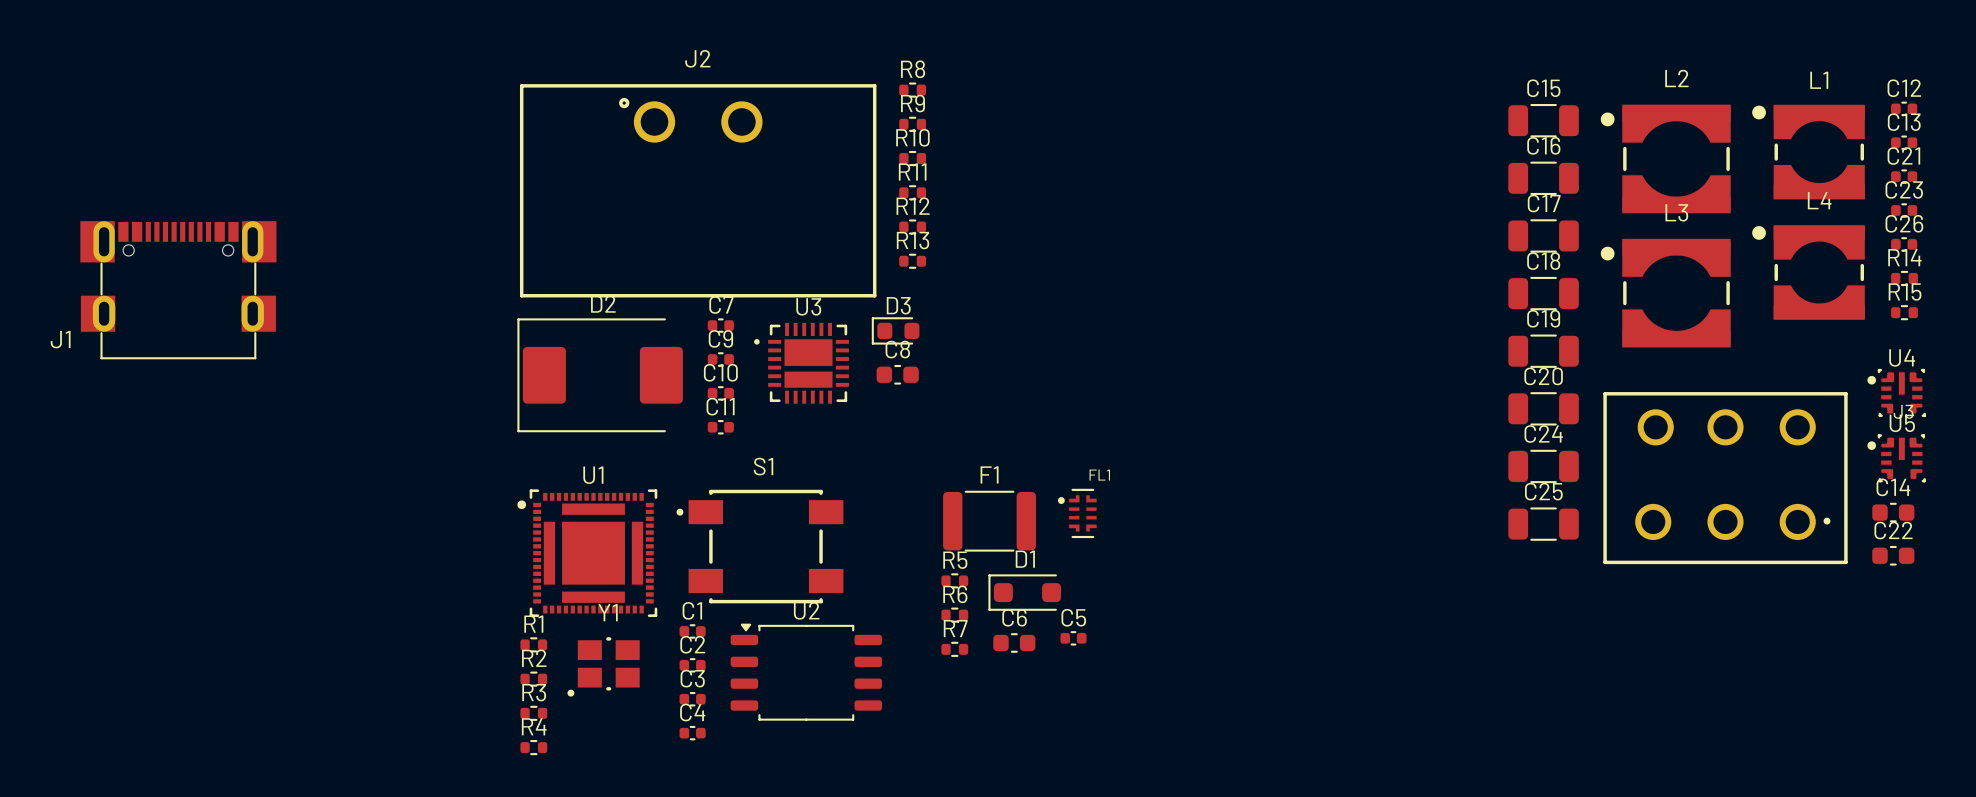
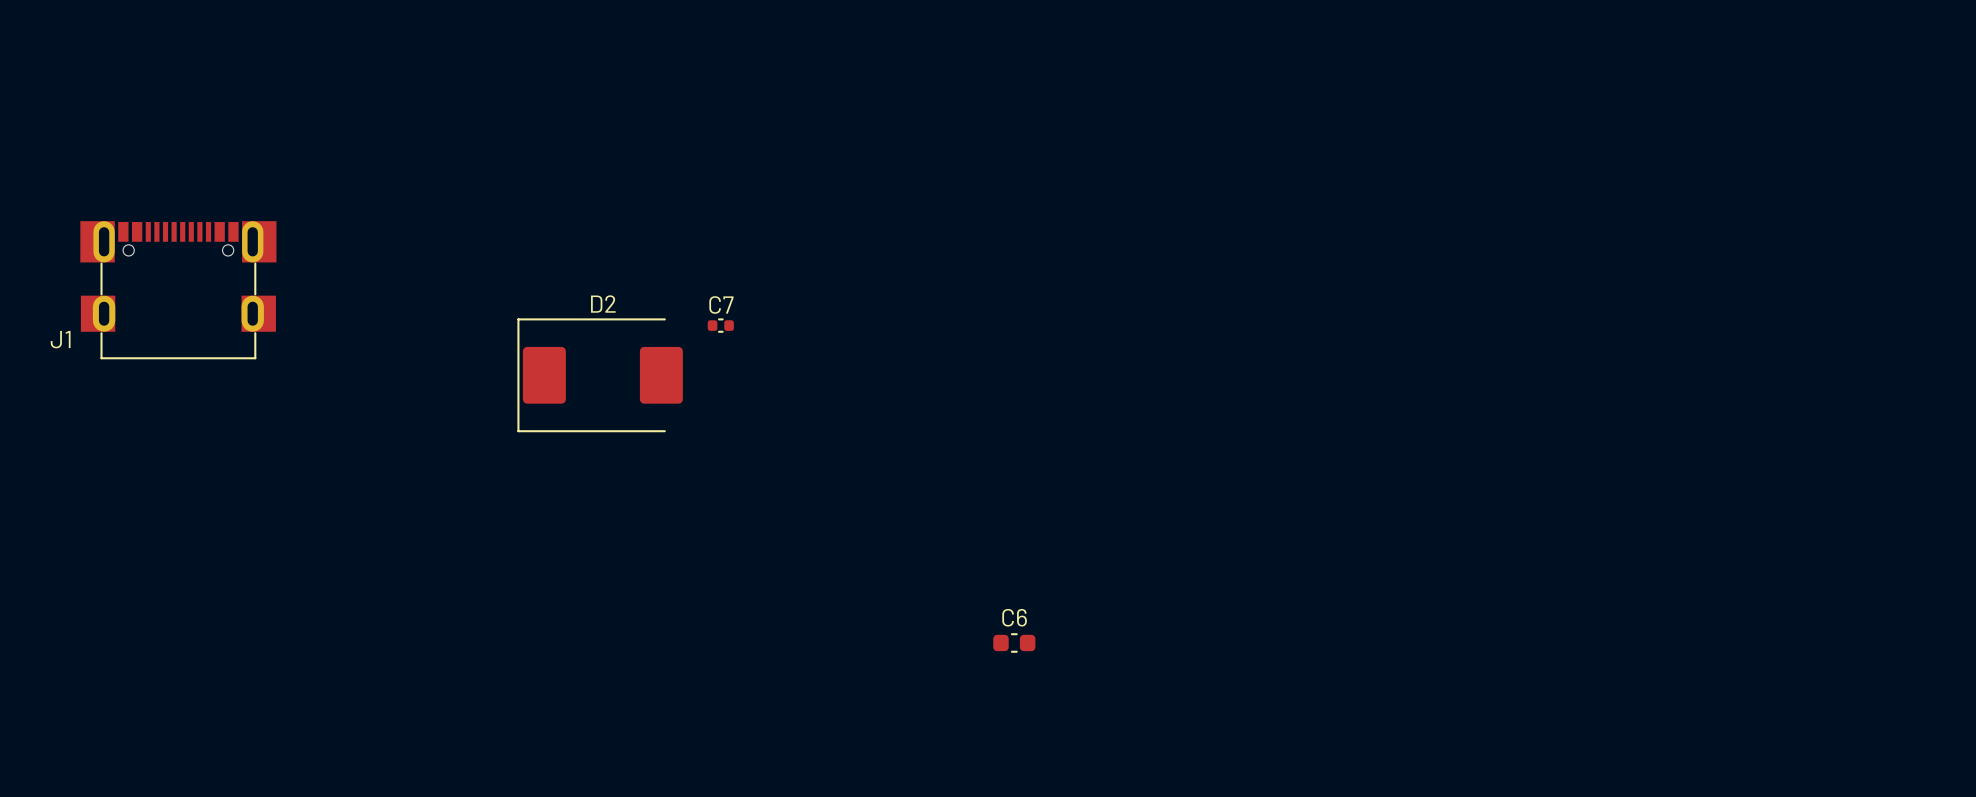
R8: (912, 90) -> none
C12: (1904, 108) -> none
C15: (1543, 120) -> none
R9: (912, 124) -> none
C13: (1904, 142) -> none
L1: (1808, 152) -> none
R10: (912, 158) -> none
L2: (1665, 158) -> none
C21: (1904, 176) -> none
C16: (1543, 178) -> none
J2: (698, 190) -> none
R11: (912, 192) -> none
C23: (1904, 210) -> none
R12: (912, 227) -> none
C17: (1543, 235) -> none
C26: (1904, 244) -> none
R13: (912, 261) -> none
L4: (1808, 272) -> none
R14: (1904, 278) -> none
C18: (1543, 293) -> none
L3: (1665, 293) -> none
R15: (1904, 312) -> none
D3: (895, 330) -> none
C19: (1543, 351) -> none
C9: (720, 359) -> none
U3: (801, 363) -> none
C8: (897, 374) -> none
U4: (1896, 392) -> none
C10: (720, 393) -> none
C20: (1543, 408) -> none
C11: (720, 427) -> none
U5: (1896, 458) -> none
C24: (1543, 466) -> none
J3: (1725, 478) -> none
C14: (1893, 512) -> none
FL1: (1077, 513) -> none
F1: (989, 521) -> none
C25: (1543, 524) -> none
S1: (759, 546) -> none
U1: (587, 553) -> none
C22: (1893, 555) -> none
R5: (954, 580) -> none
D1: (1024, 592) -> none
R6: (954, 615) -> none
C1: (692, 631) -> none
C5: (1073, 638) -> none
R1: (533, 644) -> none
R7: (954, 649) -> none
C2: (692, 665) -> none
Y1: (603, 666) -> none
U2: (806, 672) -> none
R2: (533, 679) -> none
C3: (692, 699) -> none
R3: (533, 713) -> none
C4: (692, 733) -> none
R4: (533, 747) -> none

